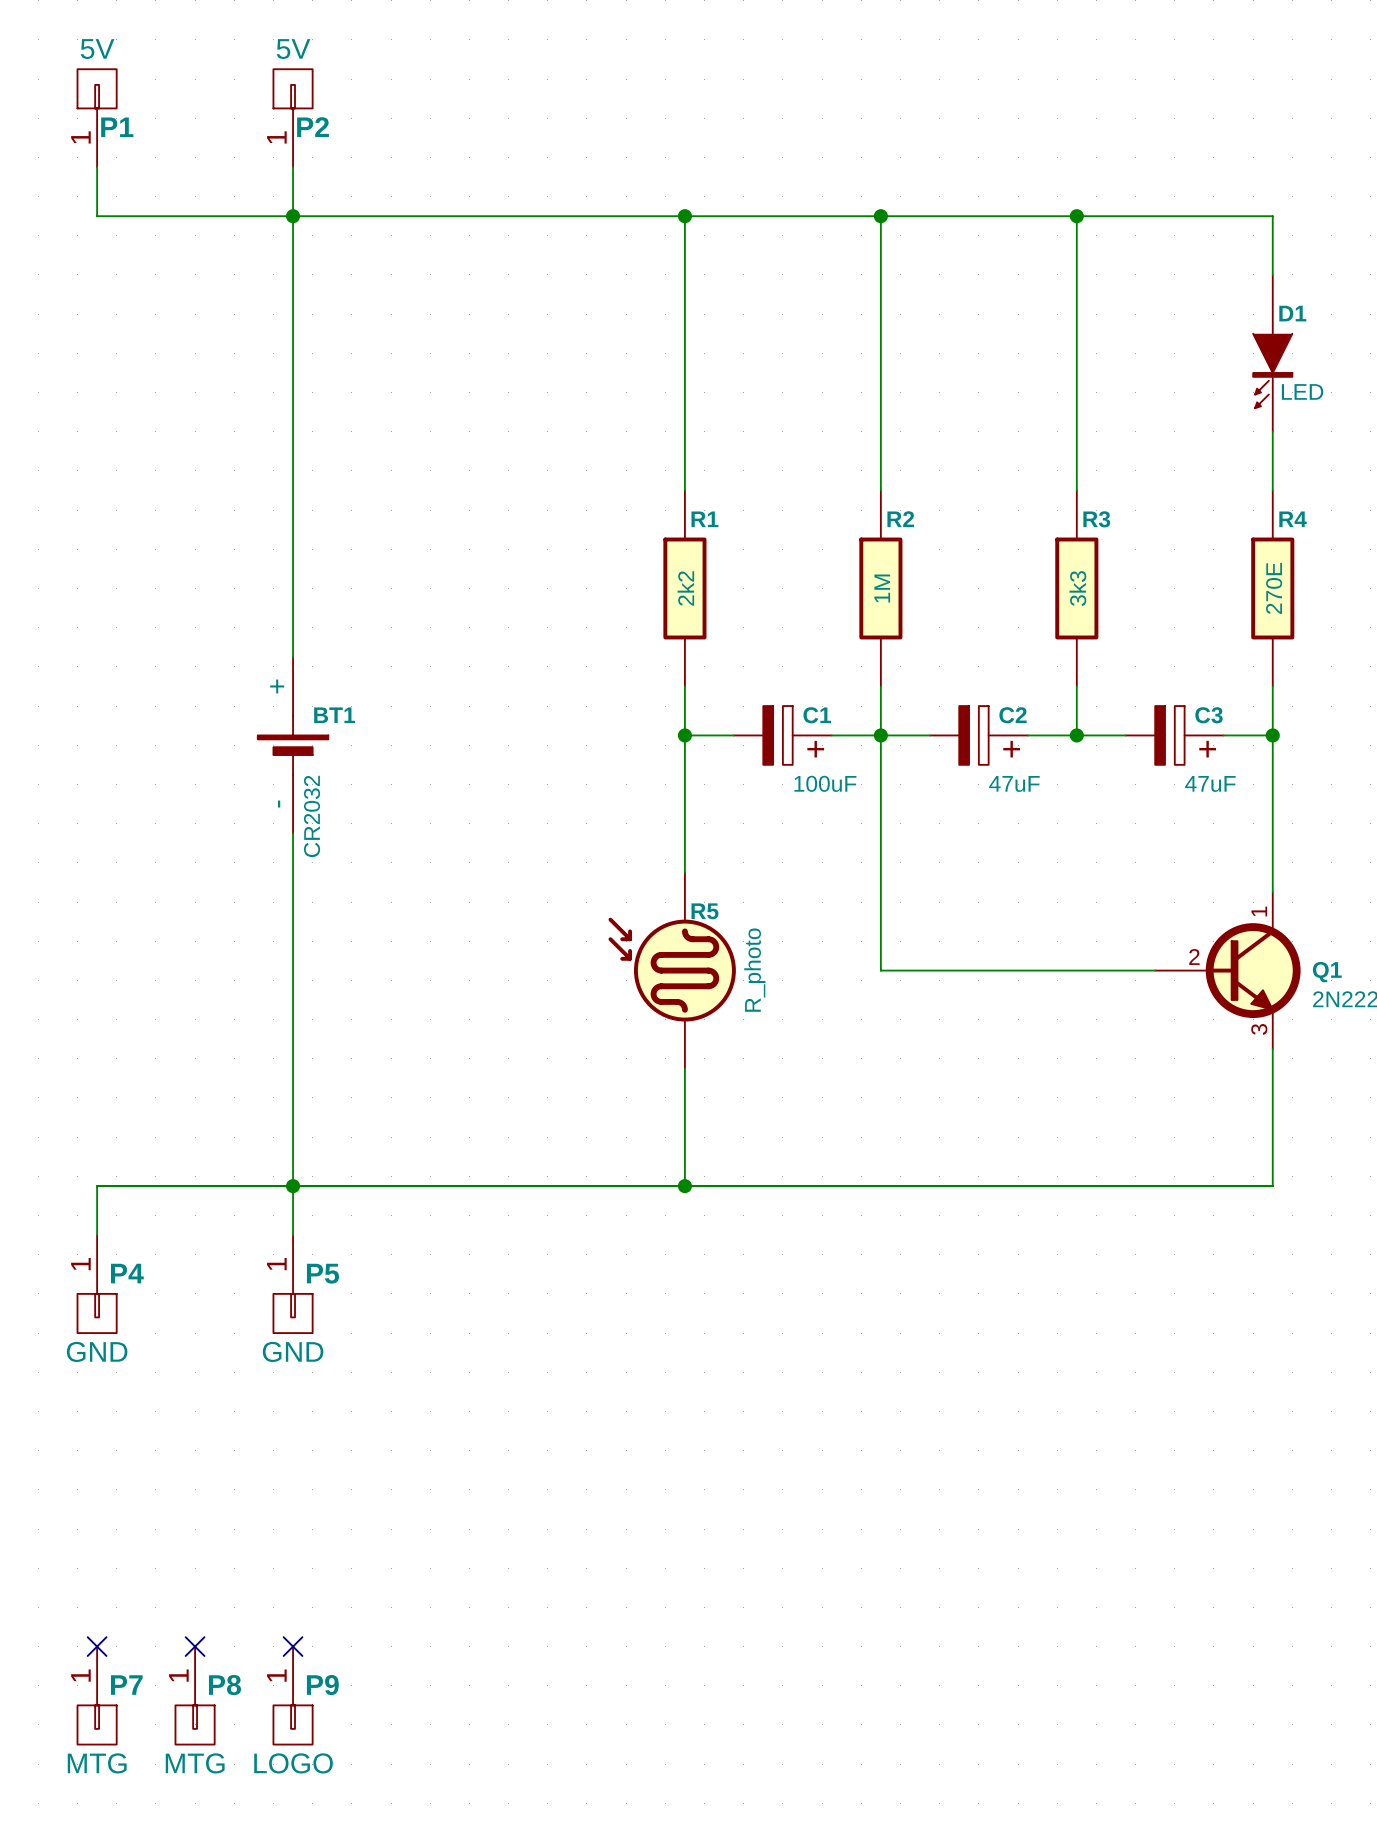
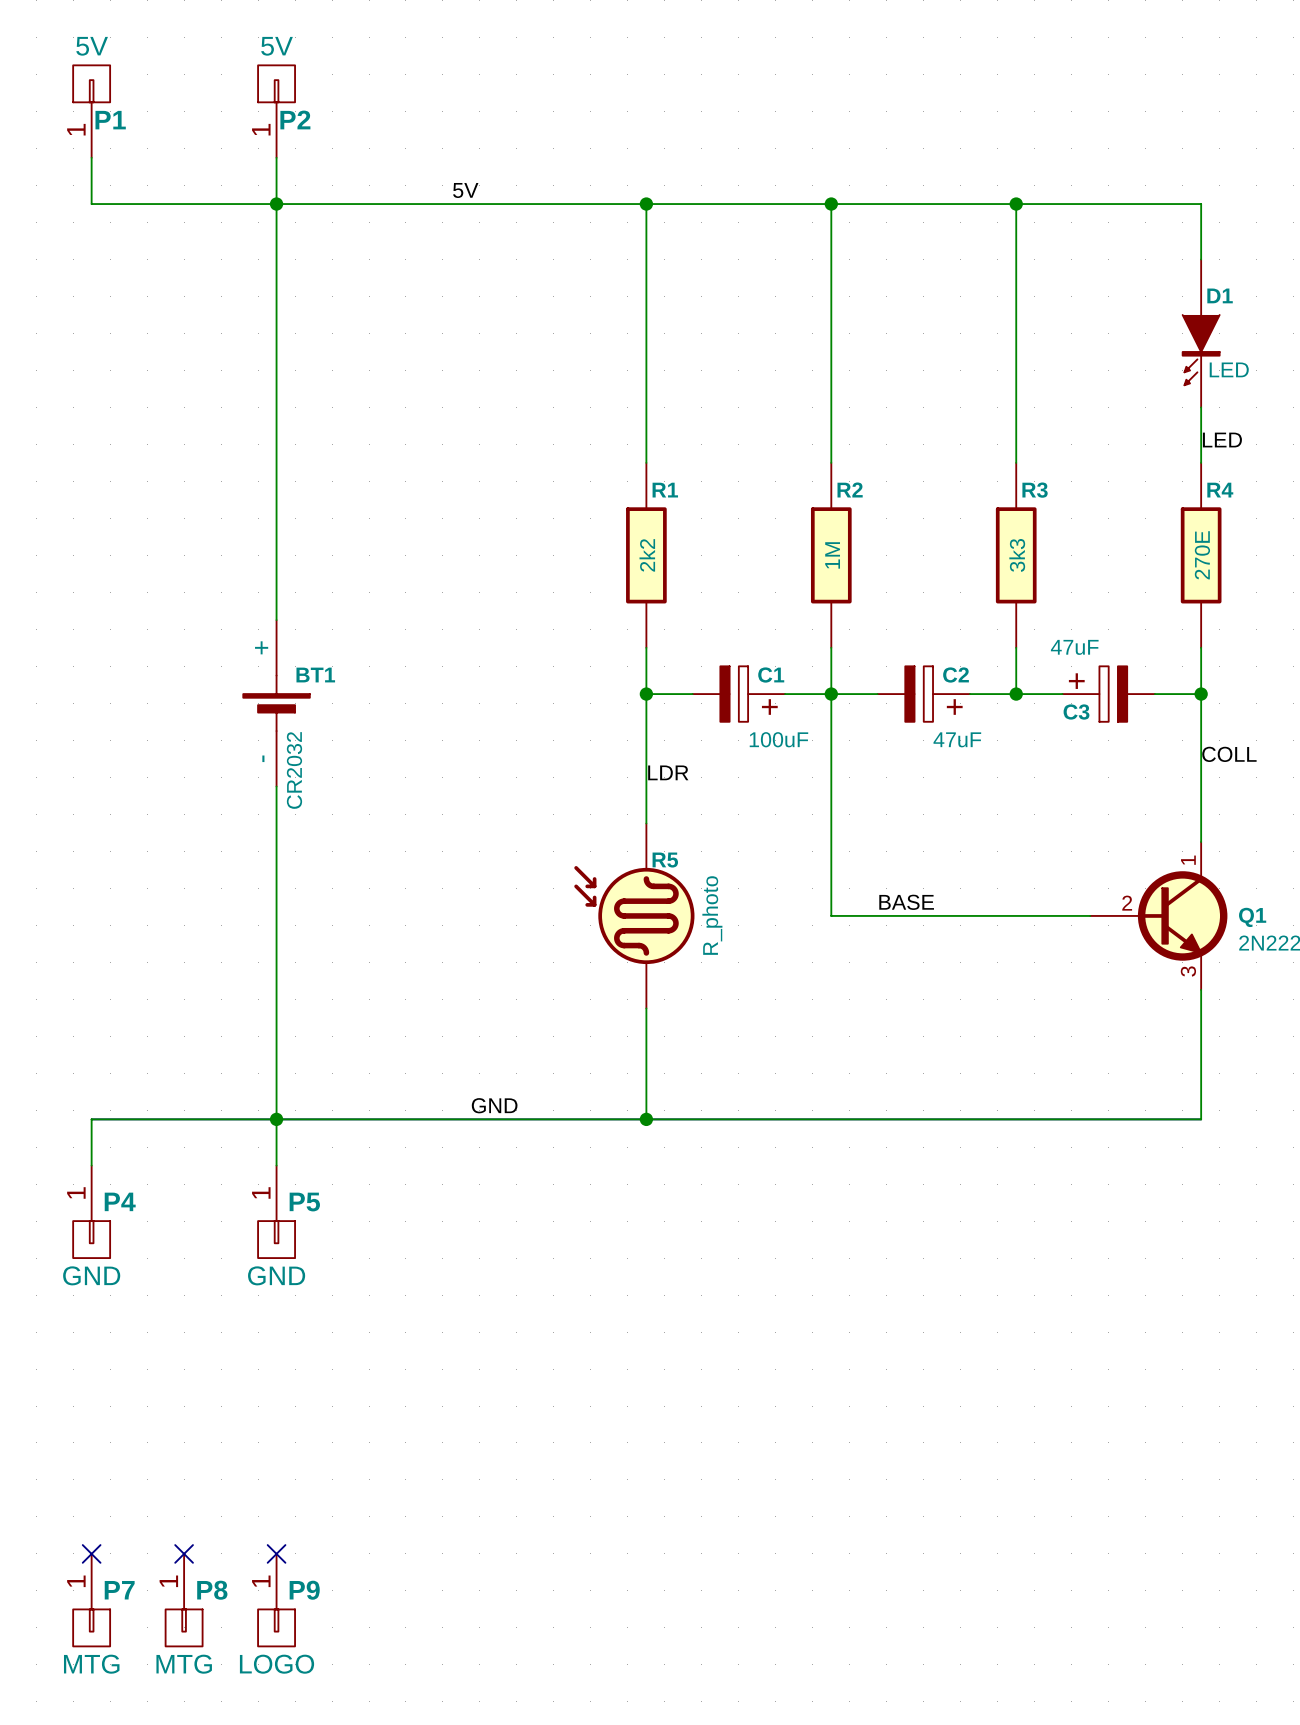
label: none -> 5V (465, 190)
label: none -> LED (1222, 440)
C3 rotation: 0° (1169, 735) -> 180° (1113, 694)
label: none -> COLL (1229, 754)
label: none -> LDR (668, 772)
label: none -> BASE (906, 902)
label: none -> GND (494, 1105)

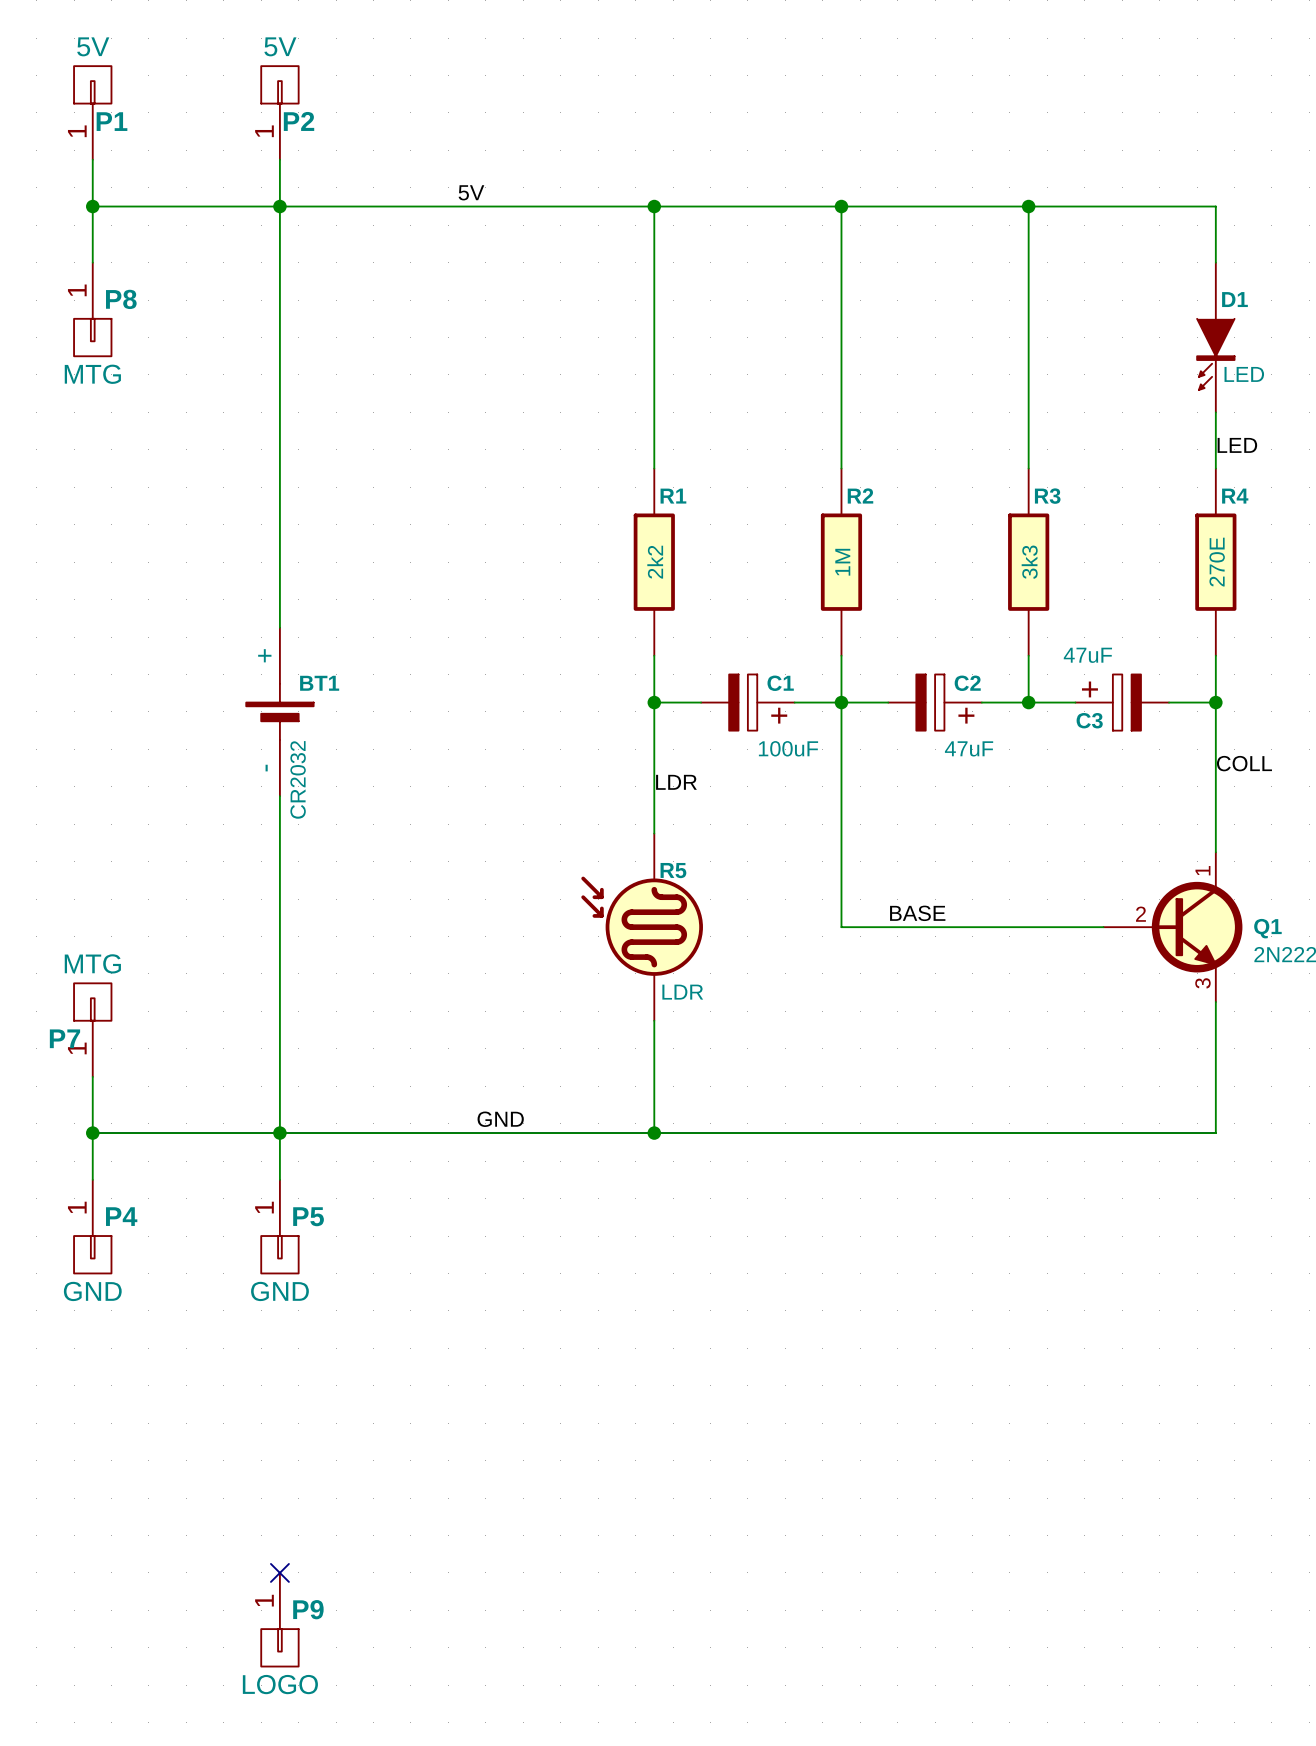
wire: none -> (92, 206) (92, 262)
junction: none -> (92, 206)
R5 value: R_photo (712, 915) -> LDR (682, 992)
wire: none -> (92, 1076) (92, 1133)
junction: none -> (92, 1133)
no-connect mark: (91, 1553) -> none
no-connect mark: (184, 1553) -> none
P7 position: (91, 1600) -> (92, 1030)
P8 position: (184, 1600) -> (92, 309)
P7 rotation: 0° (91, 1627) -> 180° (92, 1002)

